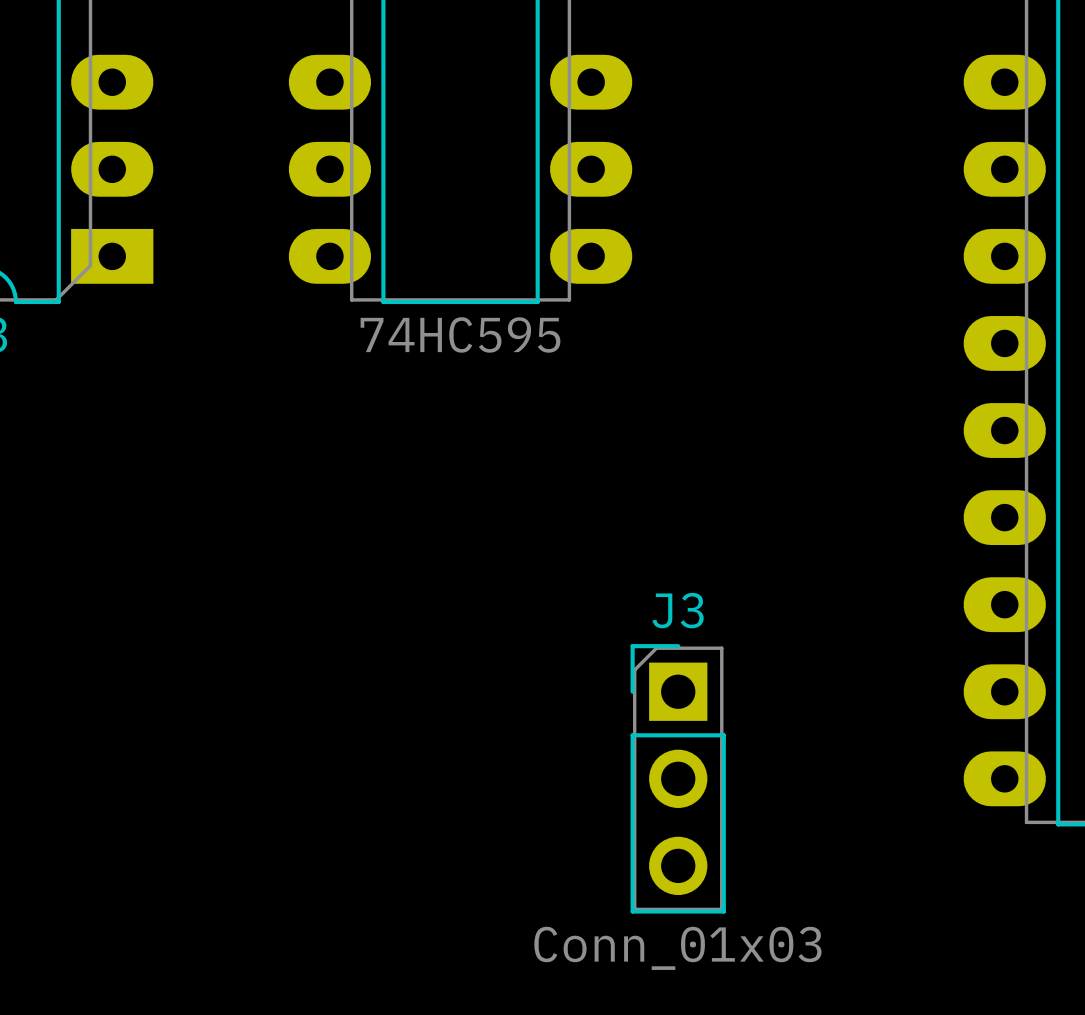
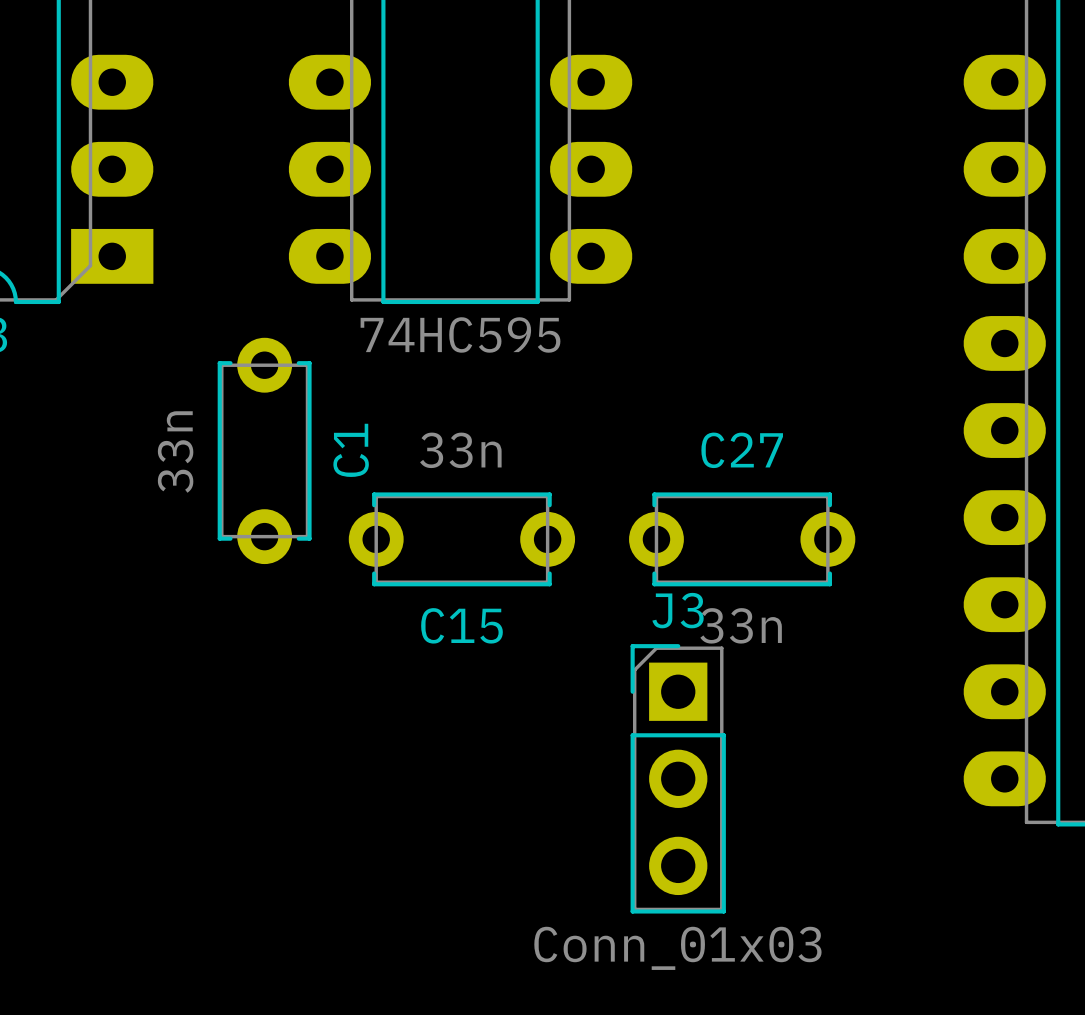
C1: none -> 33n (264, 450)
C15: none -> 33n (461, 539)
C27: none -> 33n (742, 539)

